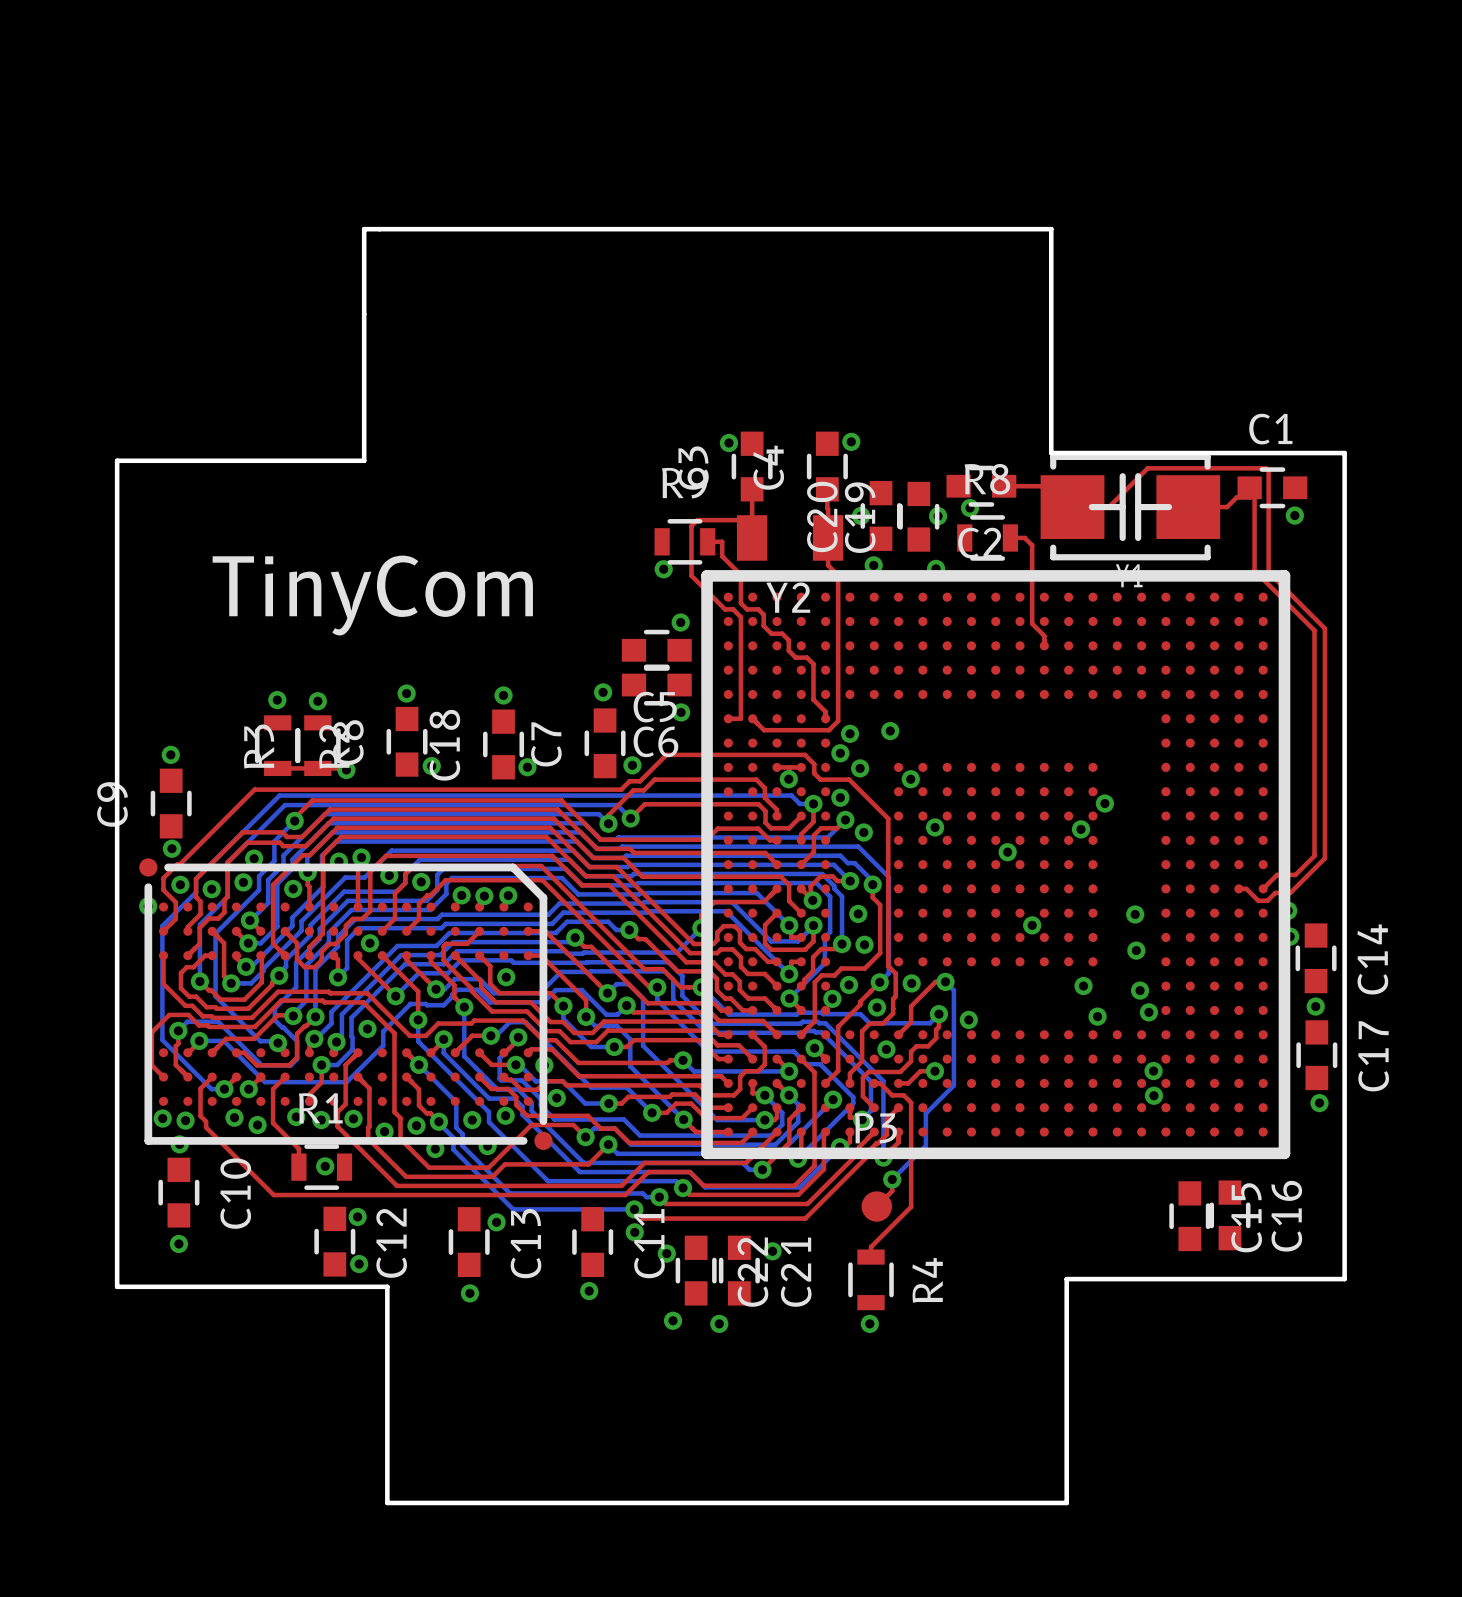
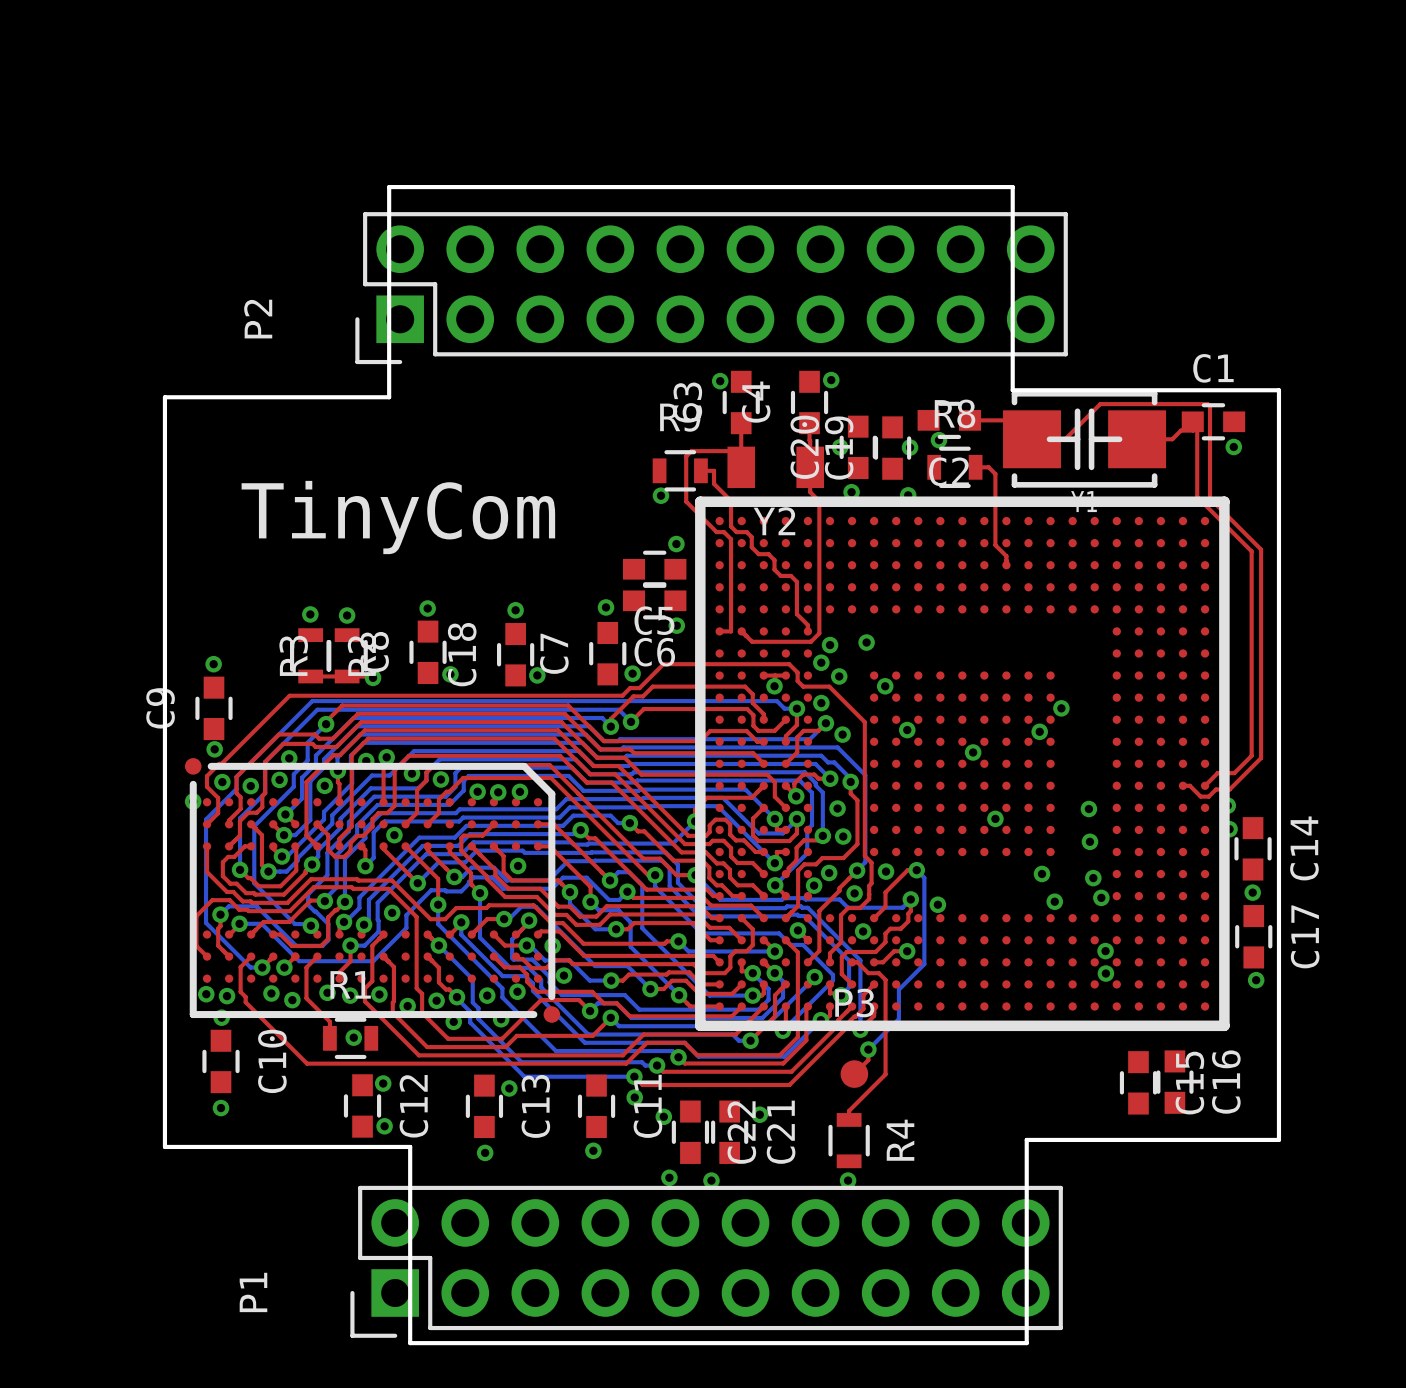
P2: none -> (711, 288)
P1: none -> (706, 1261)

